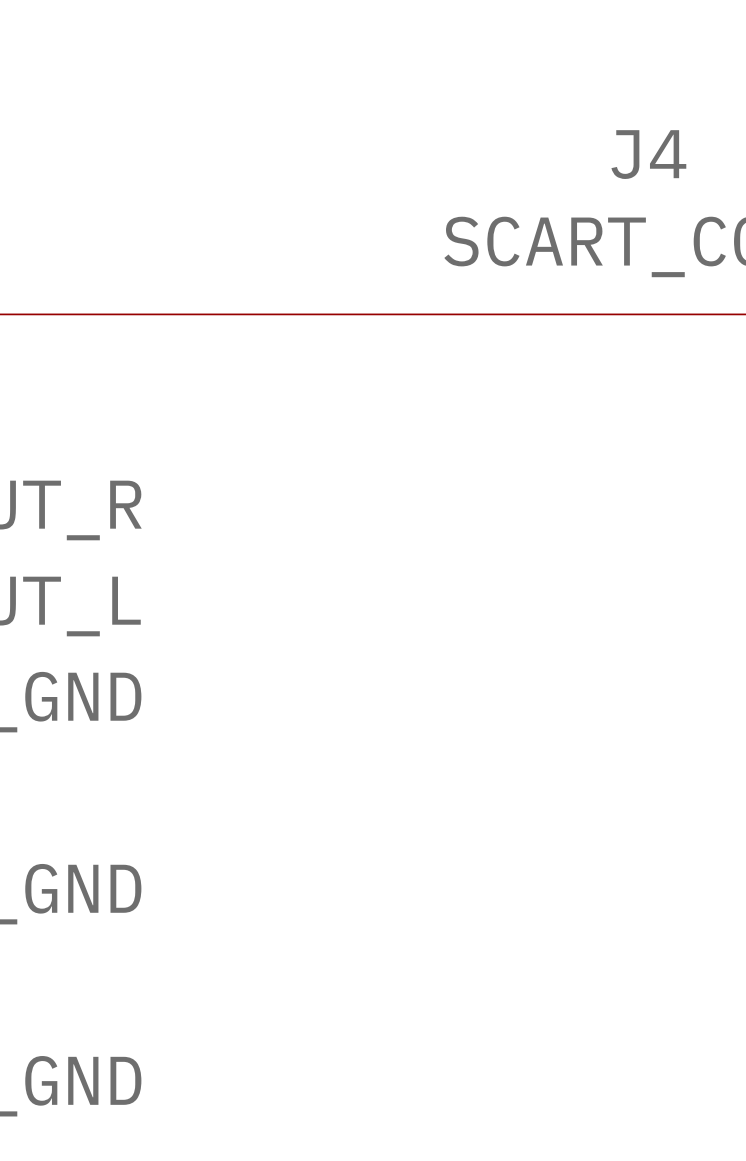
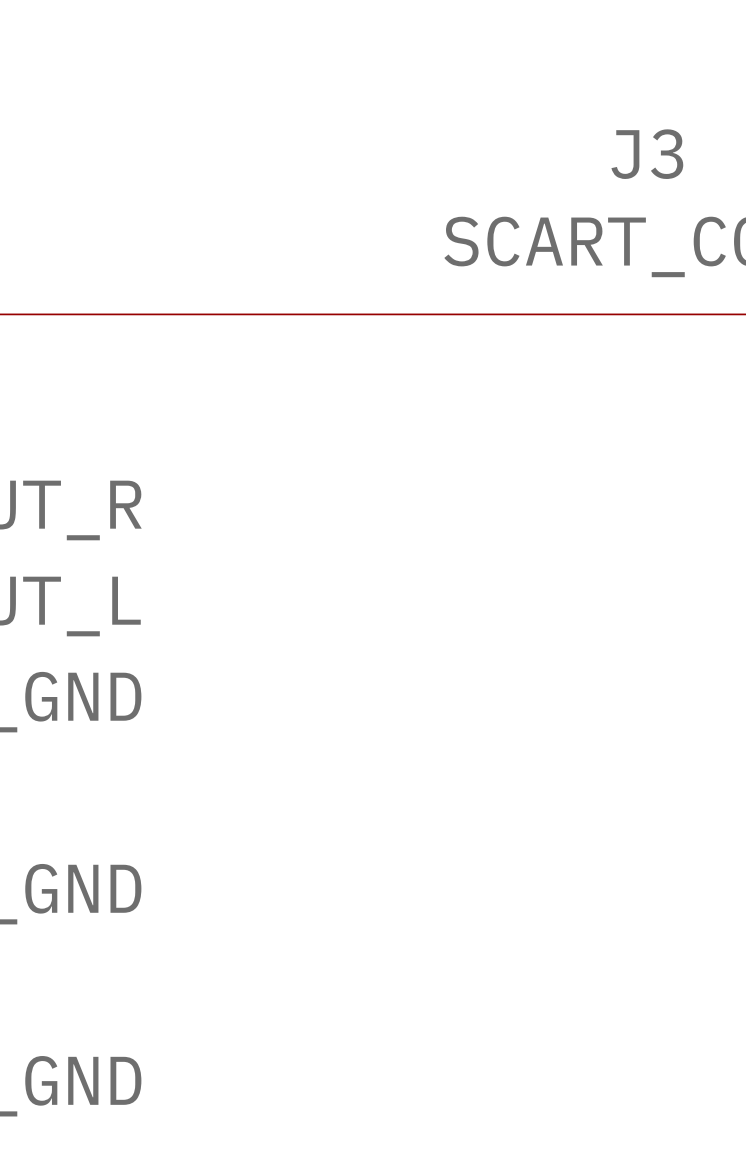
J4 name: J4 (648, 154) -> J3 (647, 154)

